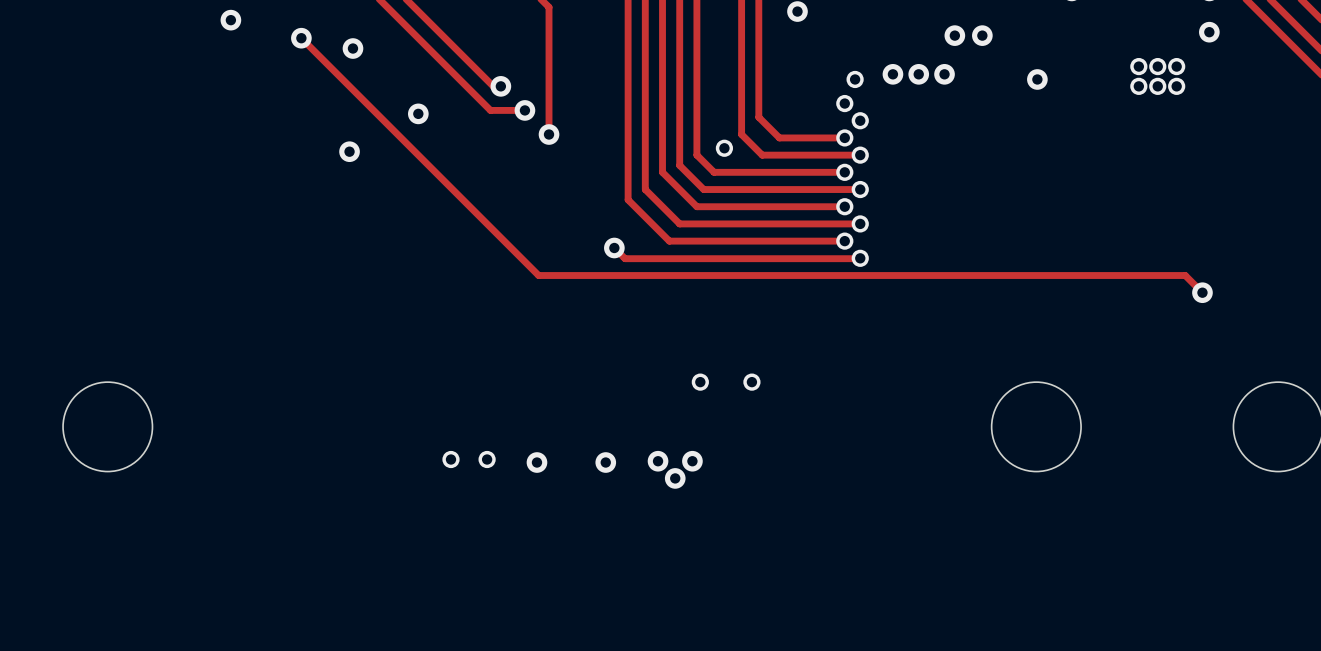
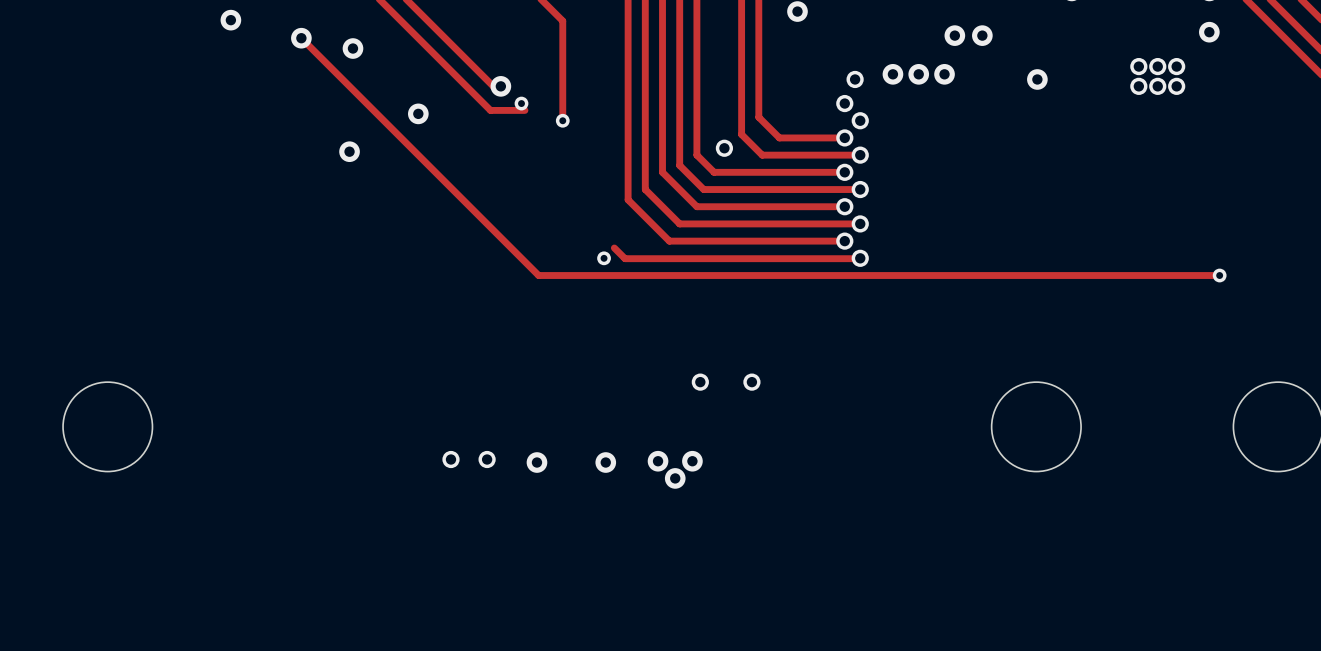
track: (549, 7) (549, 134) -> (549, 7) (562, 21) (562, 120)
via size: [514, 100, 536, 121] -> [514, 96, 529, 111]
via position: (549, 134) -> (562, 120)
via position: (614, 248) -> (604, 258)
track: (1185, 275) (1202, 292) -> (1185, 275) (1219, 275)
via position: (1202, 292) -> (1219, 275)

